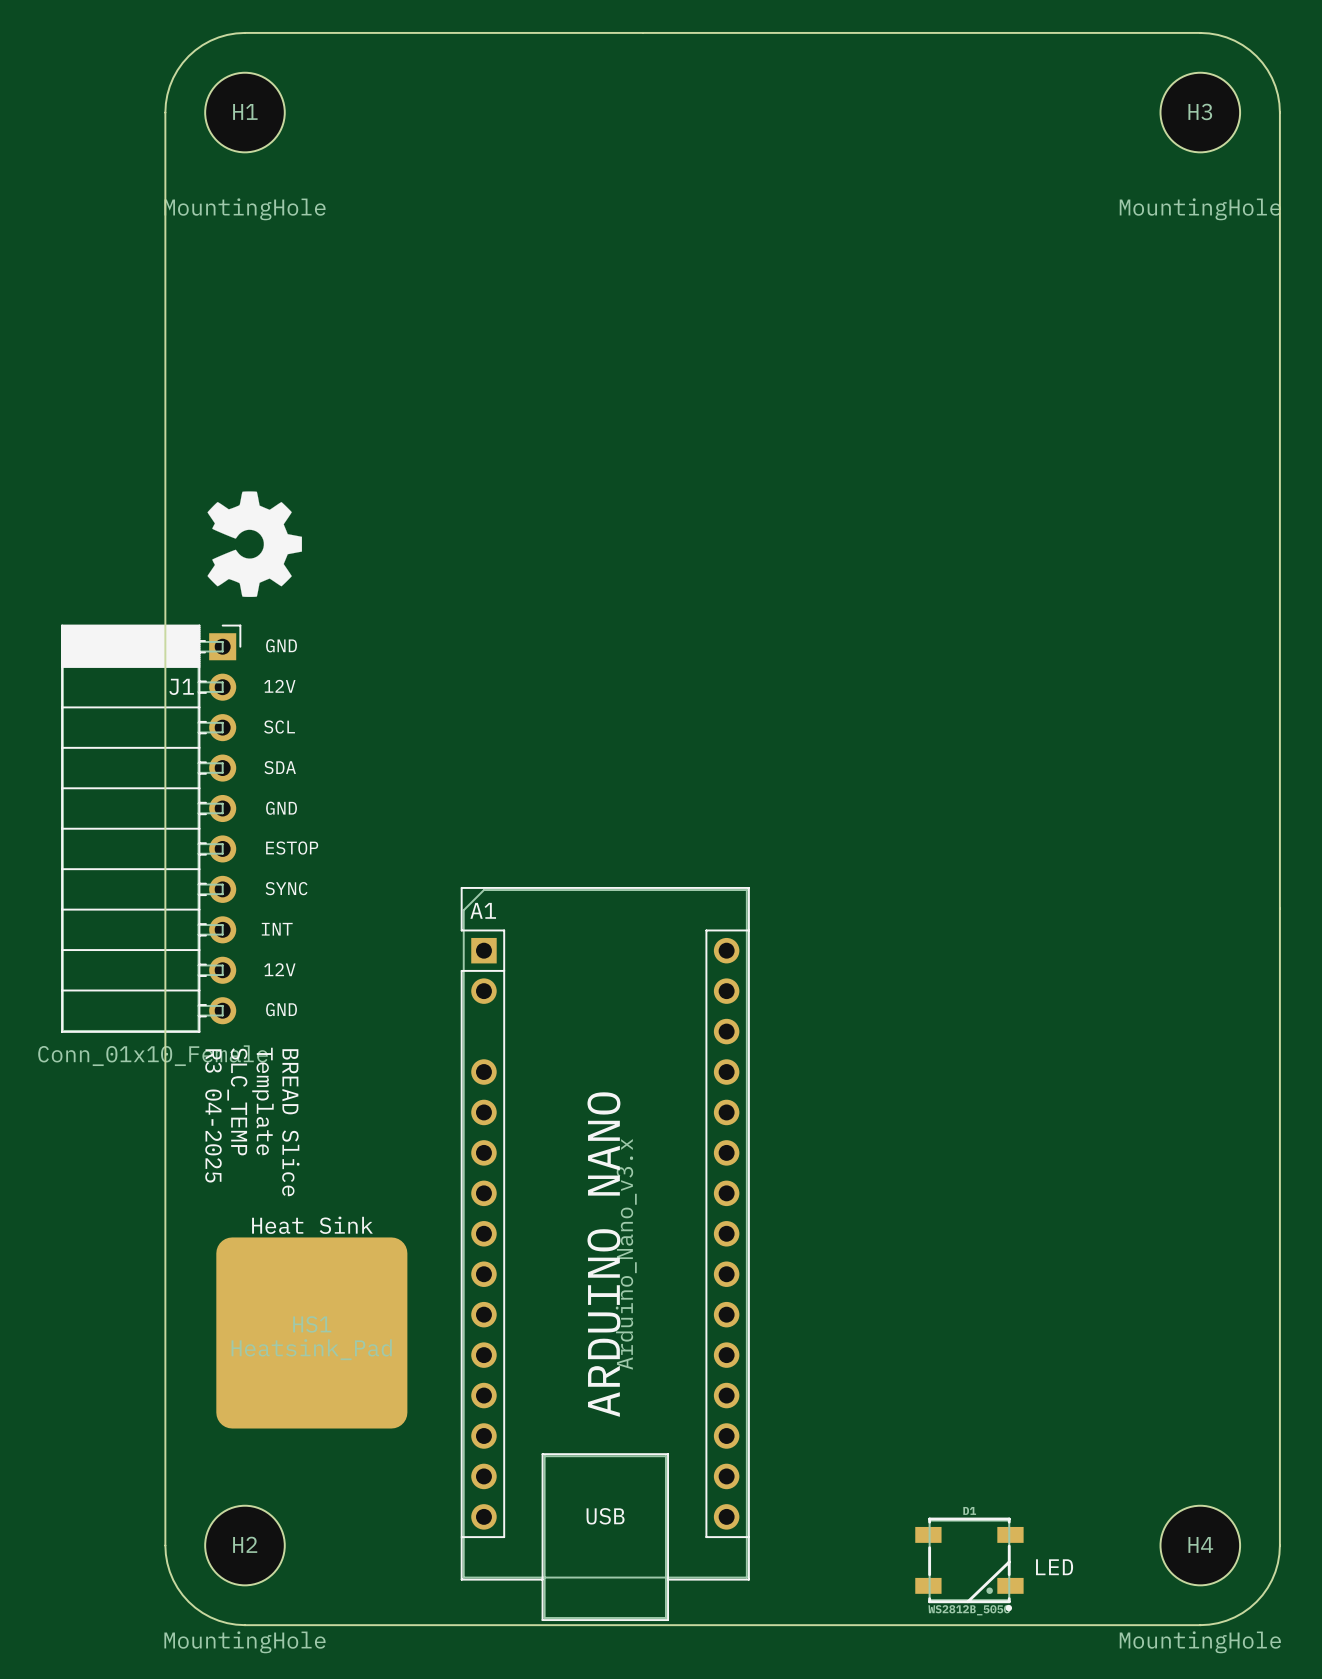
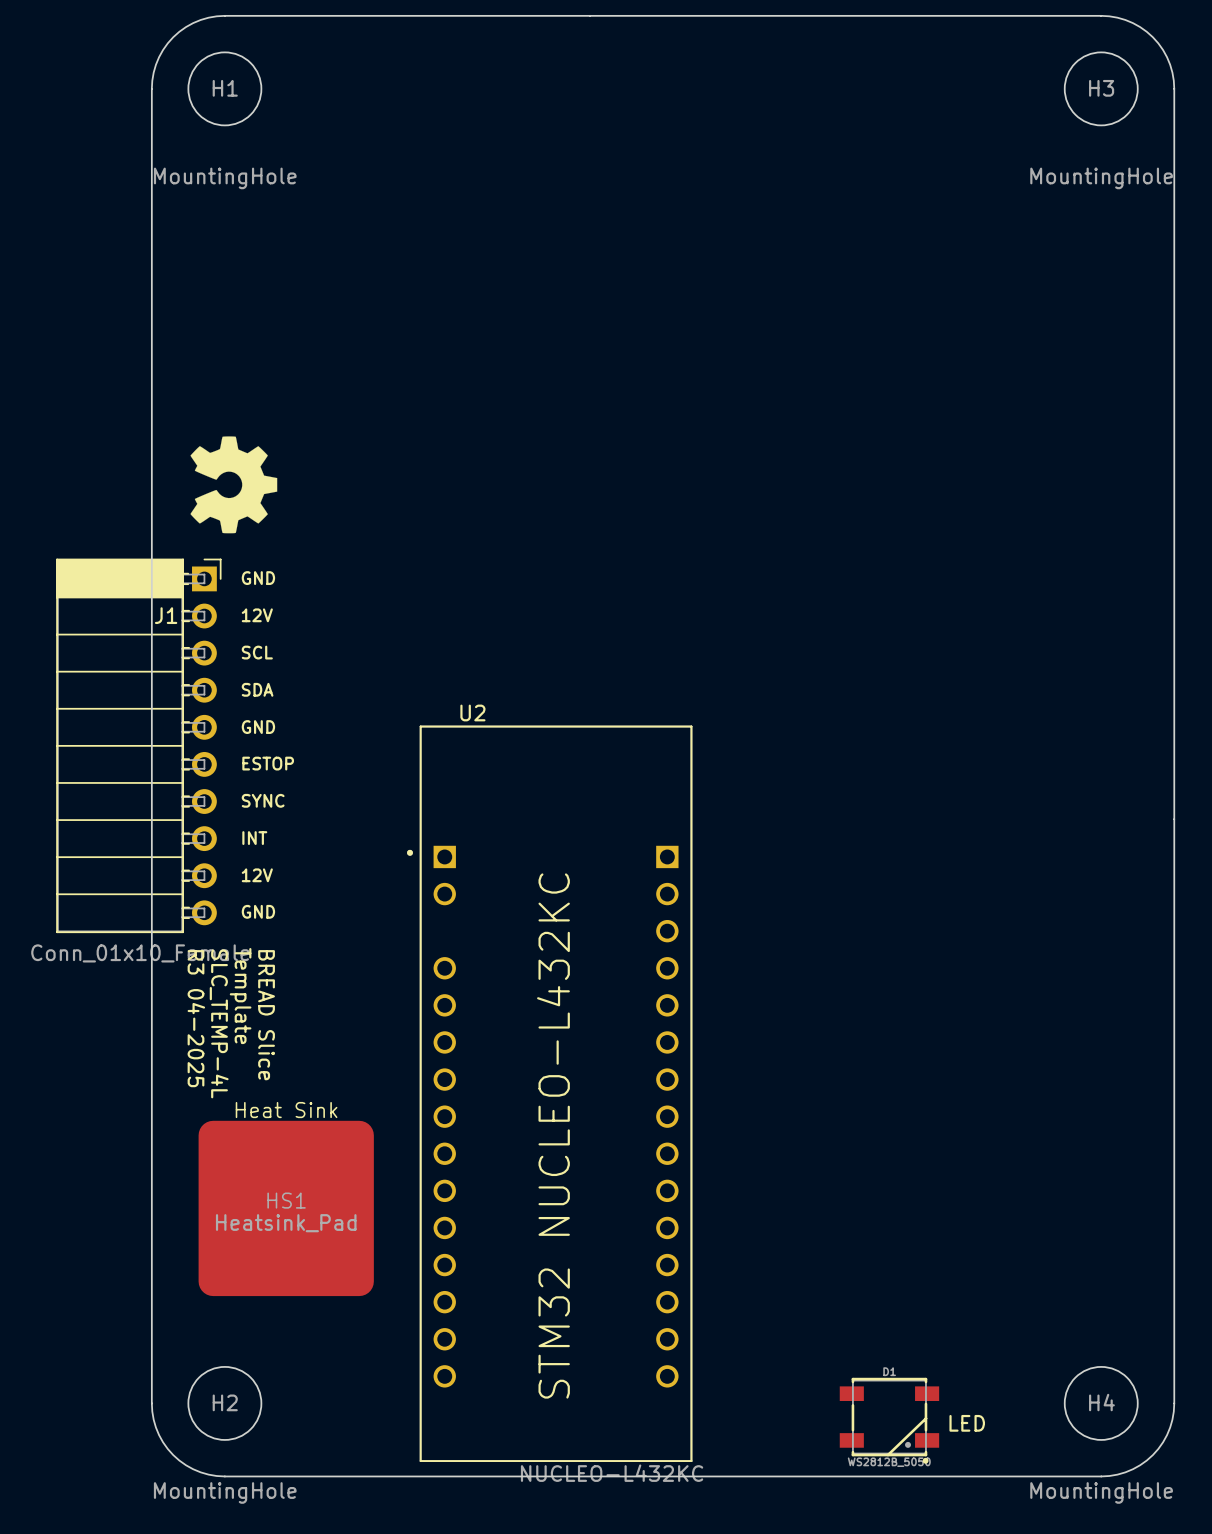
text: SLC_TEMP (237, 1101) -> SLC_TEMP-4L (219, 1023)
U2: none -> NUCLEO-L432KC (549, 1093)
text: ARDUINO NANO (603, 1254) -> STM32 NUCLEO-L432KC (553, 1135)
A1: Arduino_Nano_v3.x (605, 1254) -> none

